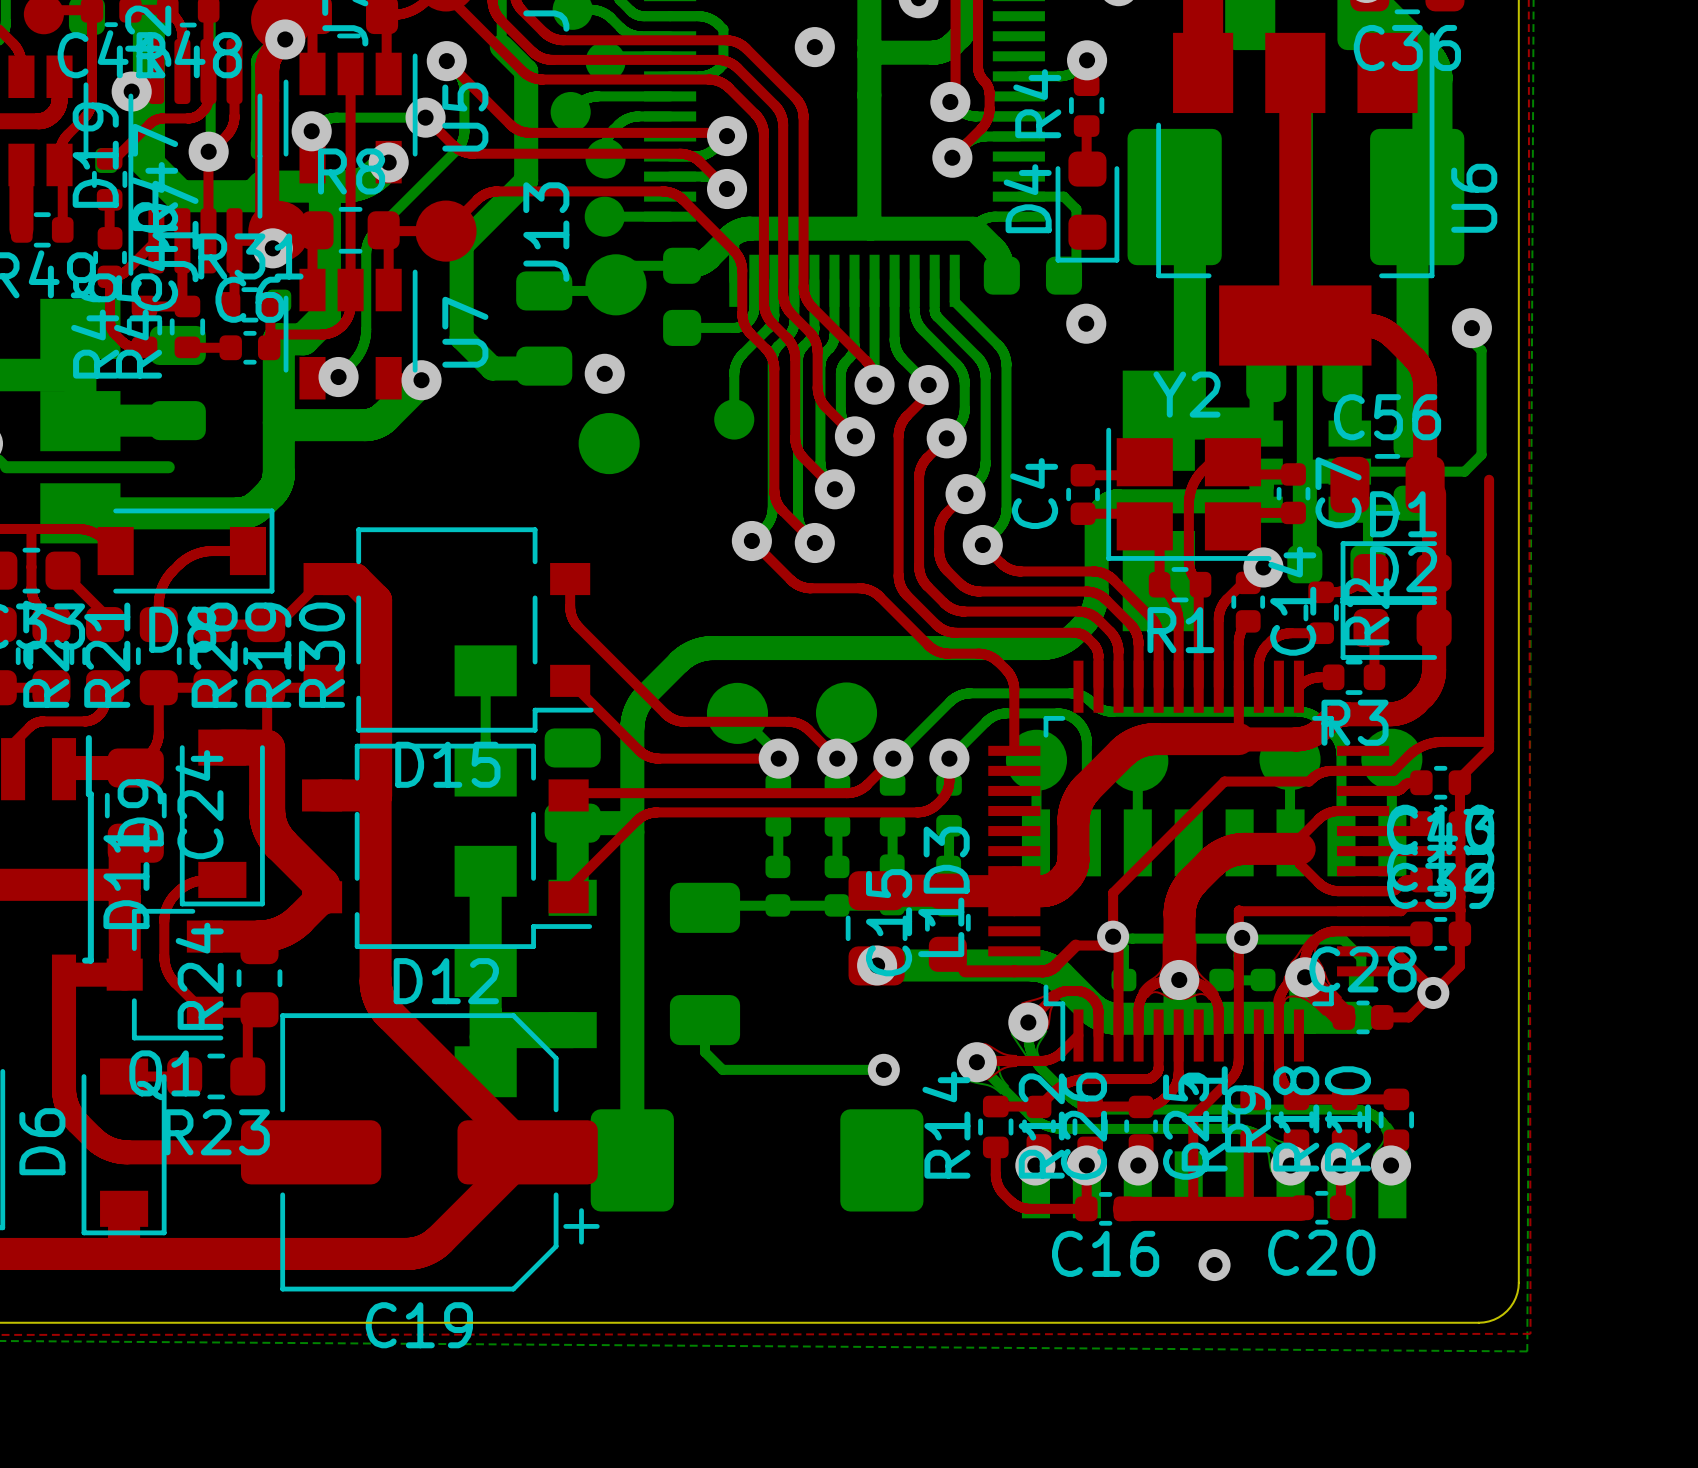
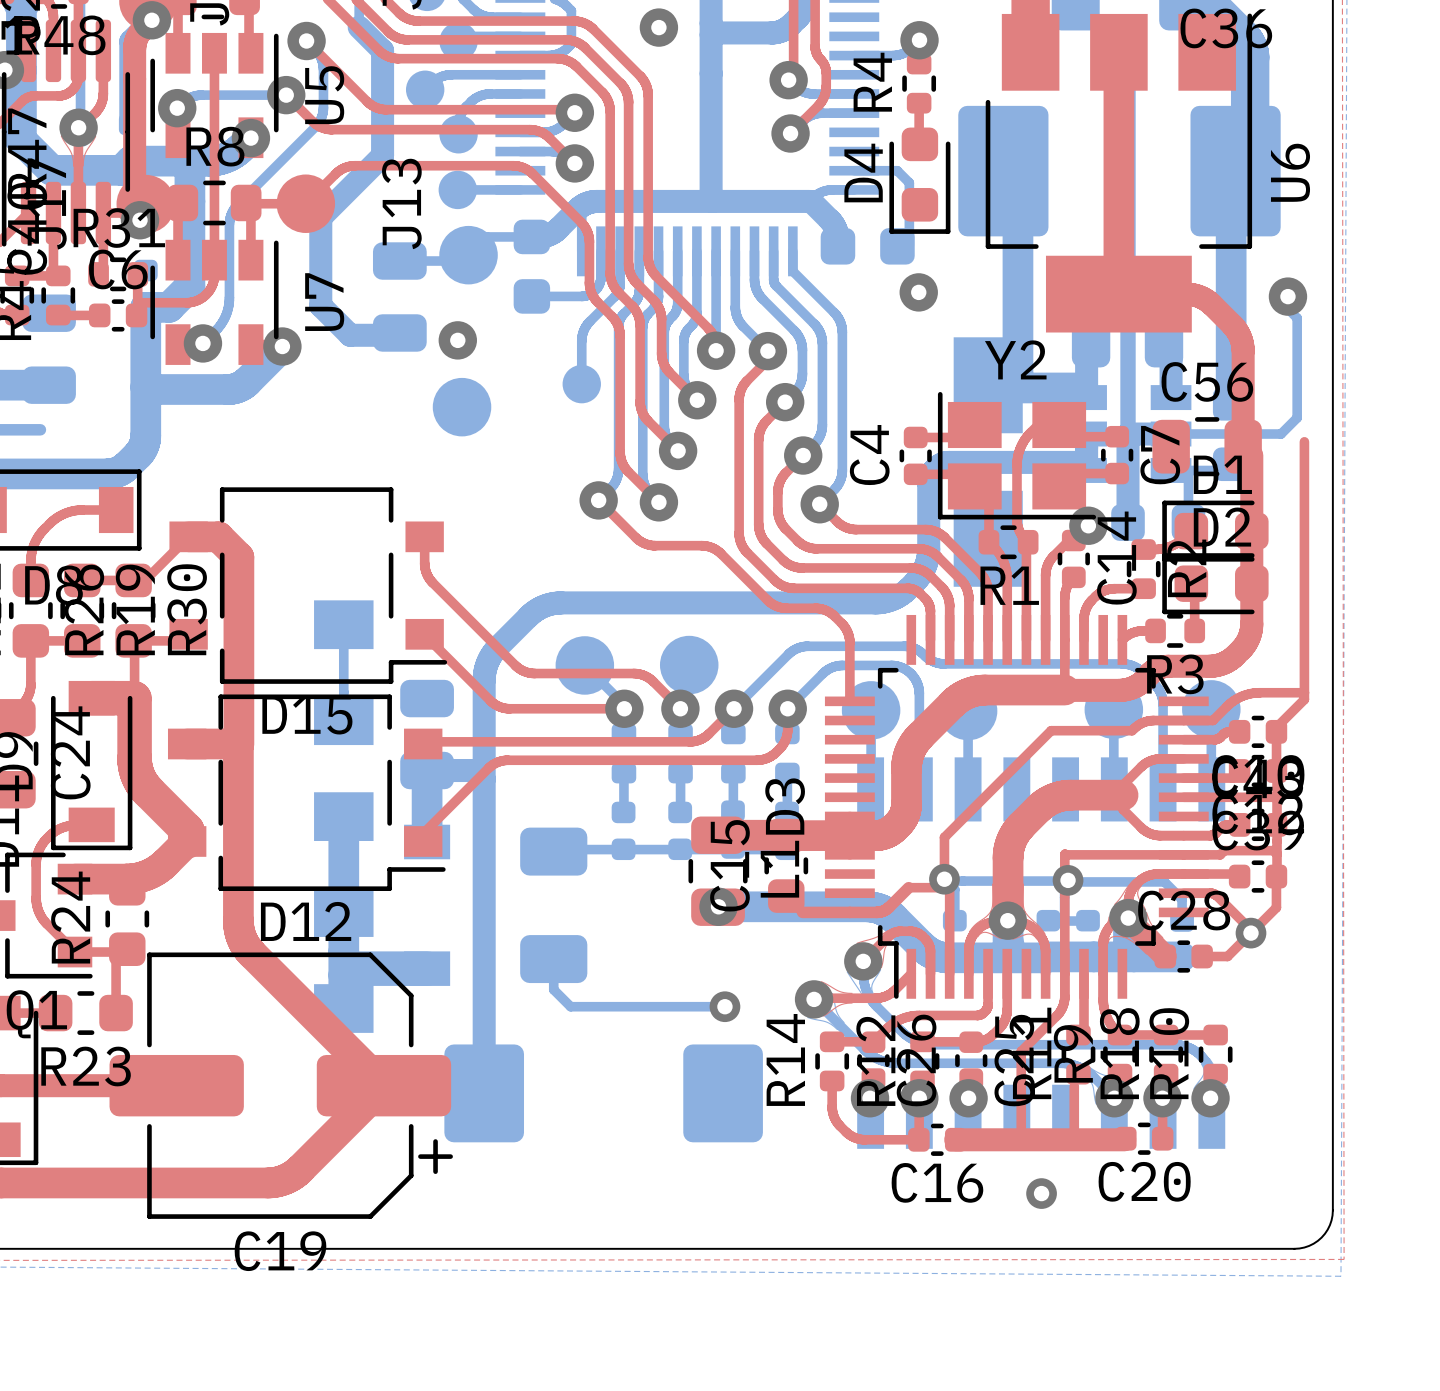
top zone outline: none -> (78, 118) (95, 136) (85, 152) (83, 166) (73, 166) (71, 152) (61, 135) (78, 118)

